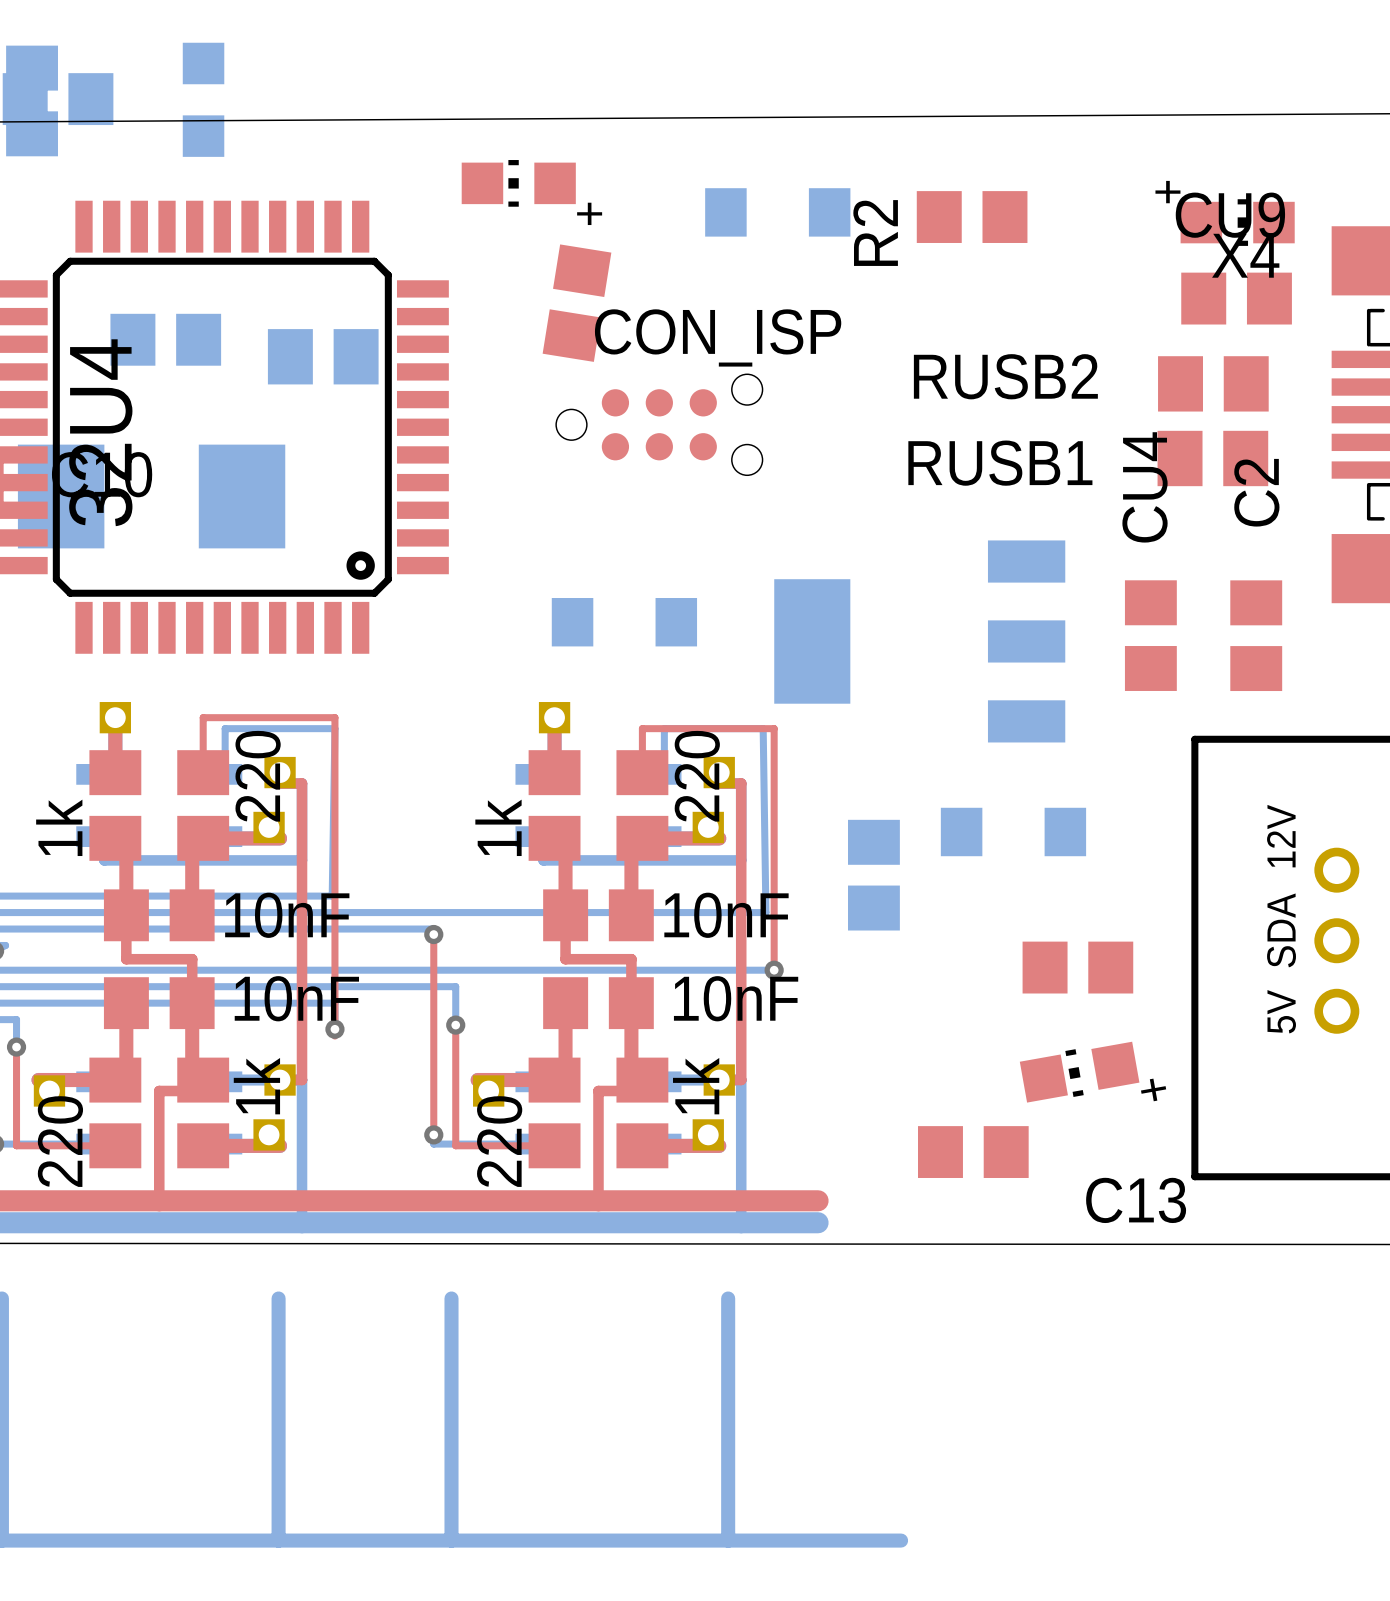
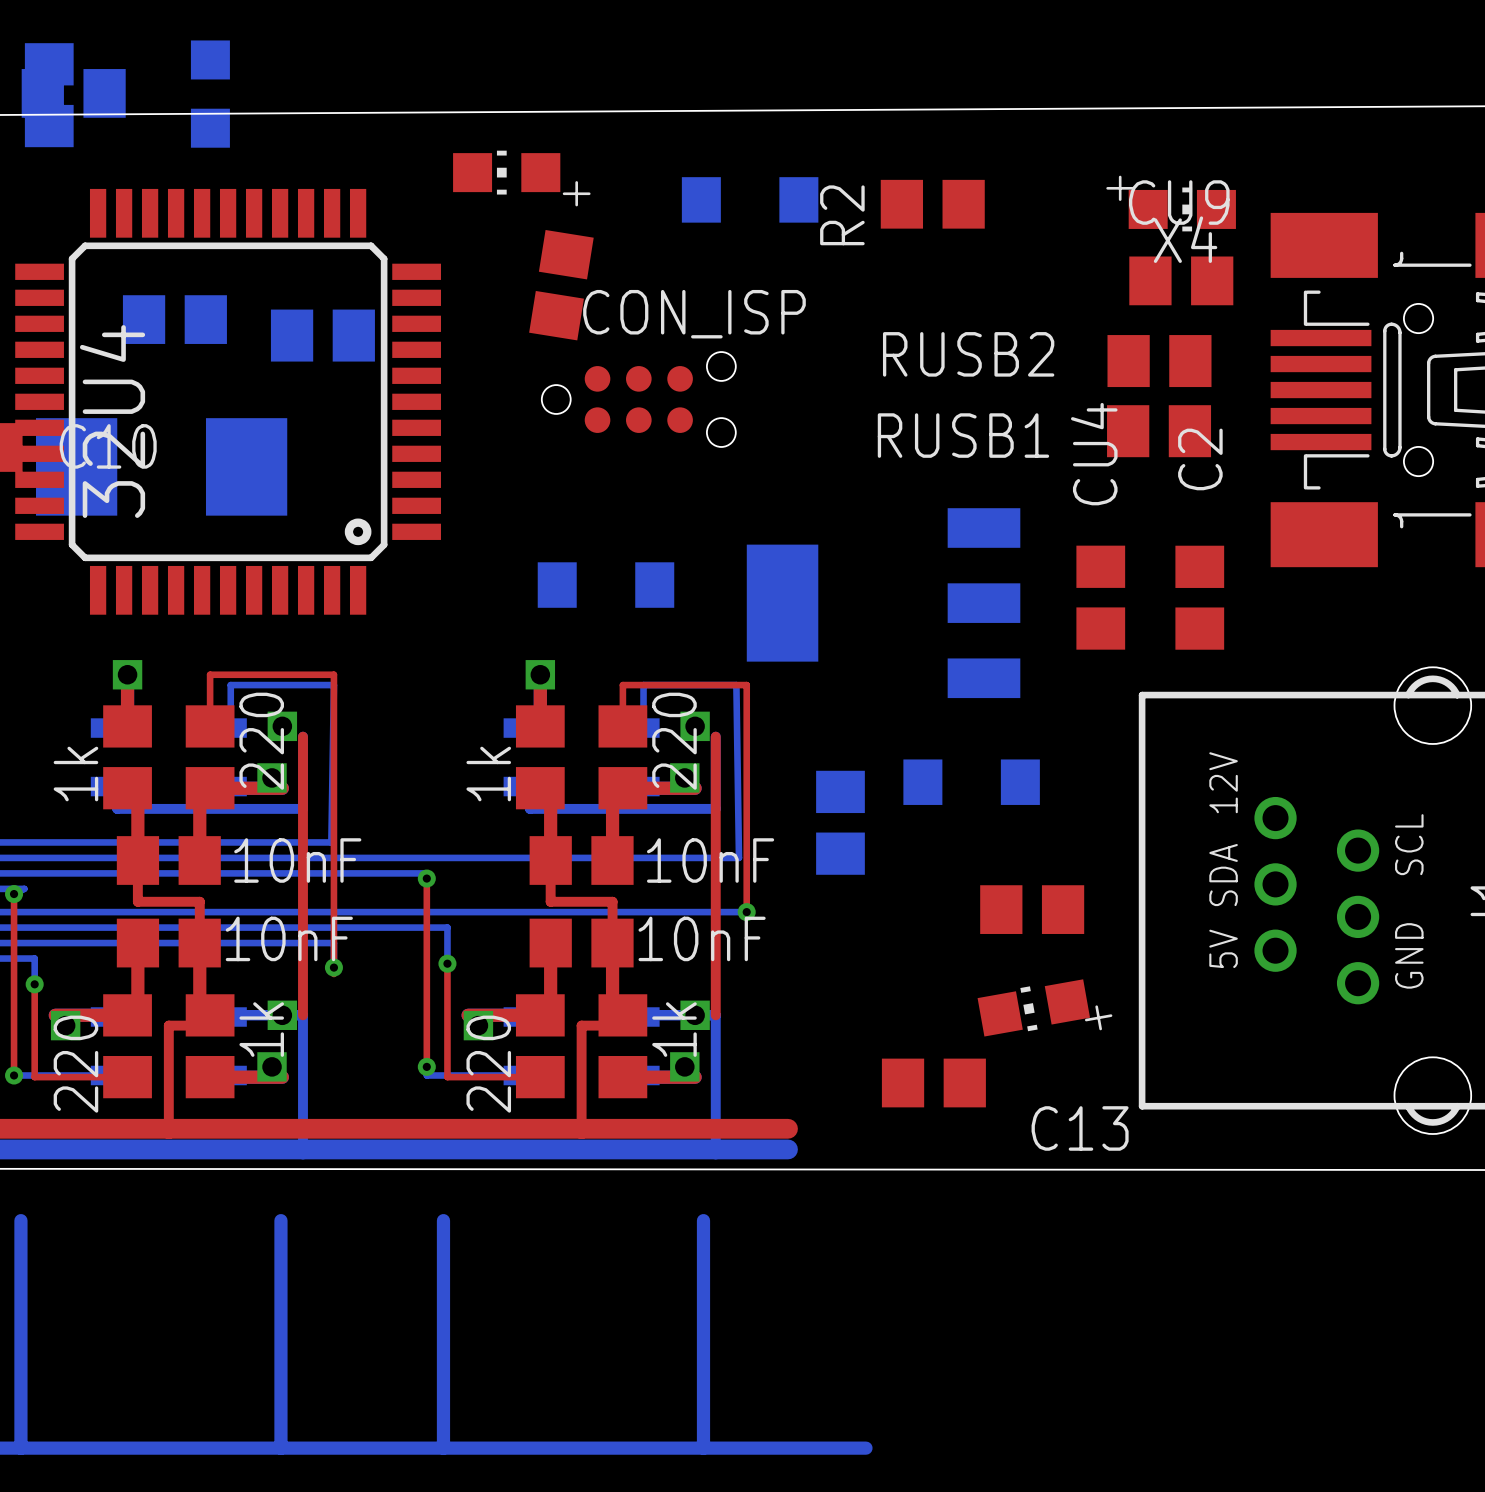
part footprint: [31, 702, 308, 1169] -> [48, 660, 308, 1099]
part footprint: [470, 702, 747, 1169] -> [461, 660, 721, 1099]

